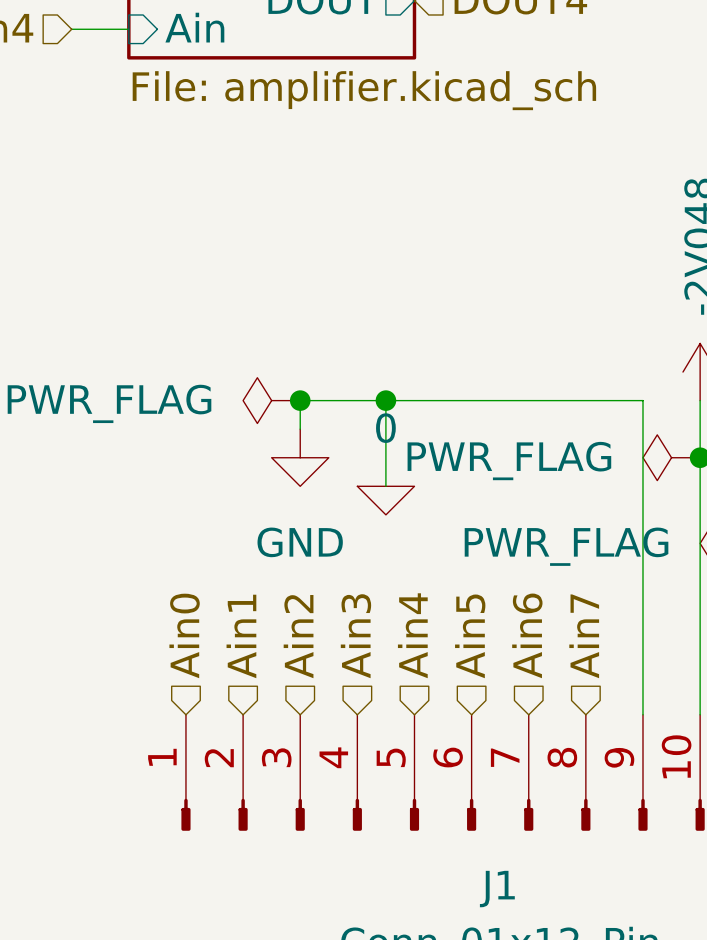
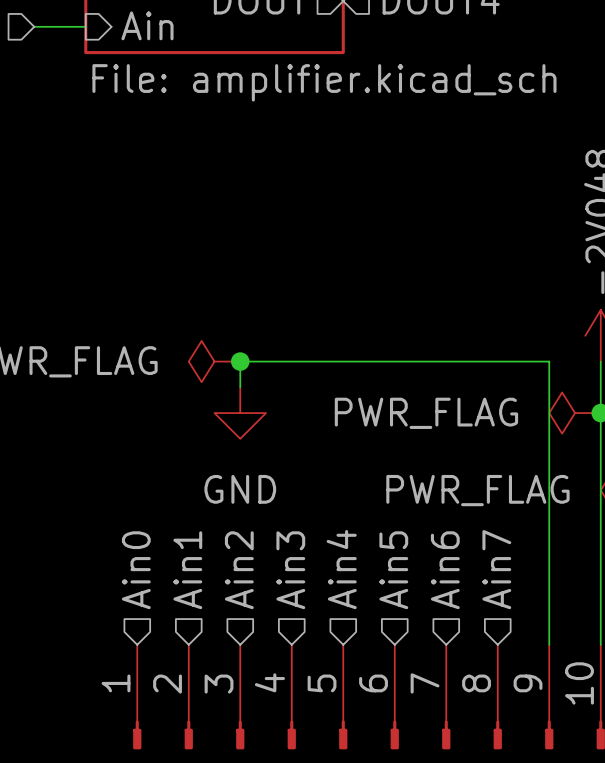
wire: (385, 400) (385, 486) -> none
junction: (385, 400) -> none
power symbol: 0 (385, 500) -> none

